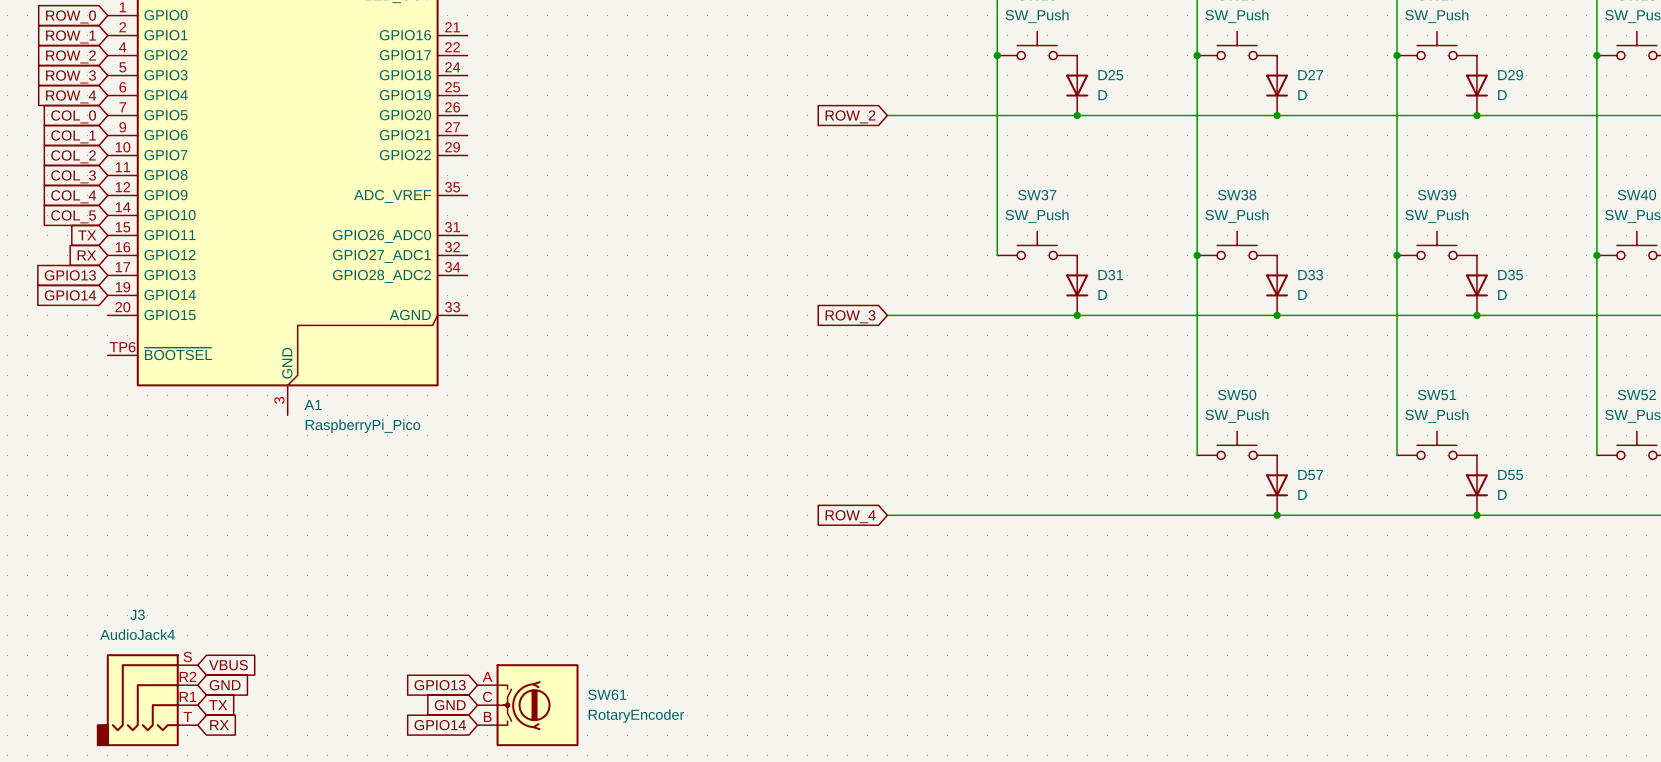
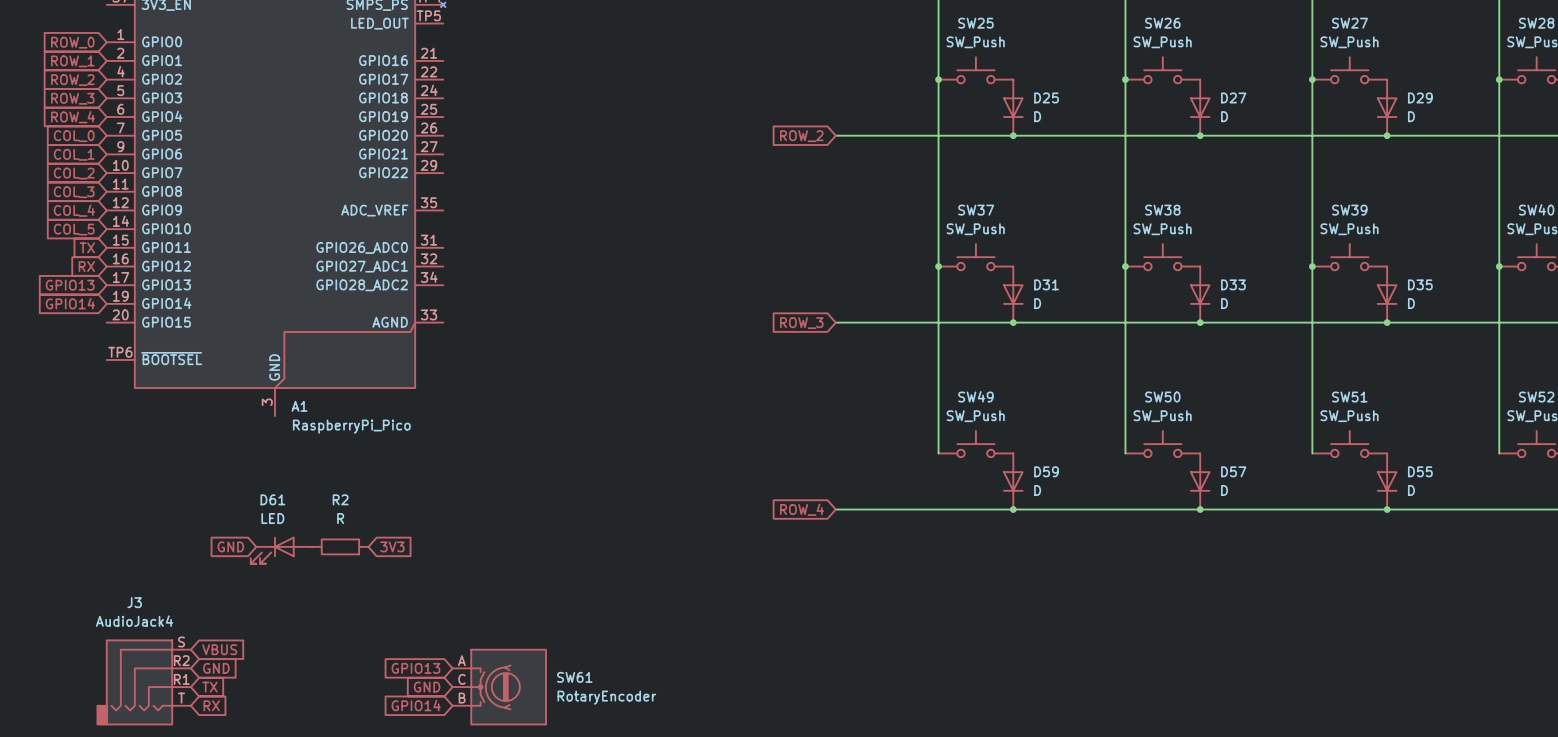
wire: none -> (938, 266) (938, 453)
junction: none -> (938, 266)
SW49: none -> SW_Push (975, 444)
D59: none -> D (1013, 481)
junction: none -> (1013, 509)
global label: none -> GND (230, 546)
R2: none -> R (340, 546)
global label: none -> 3V3 (392, 546)
D61: none -> LED (281, 550)

